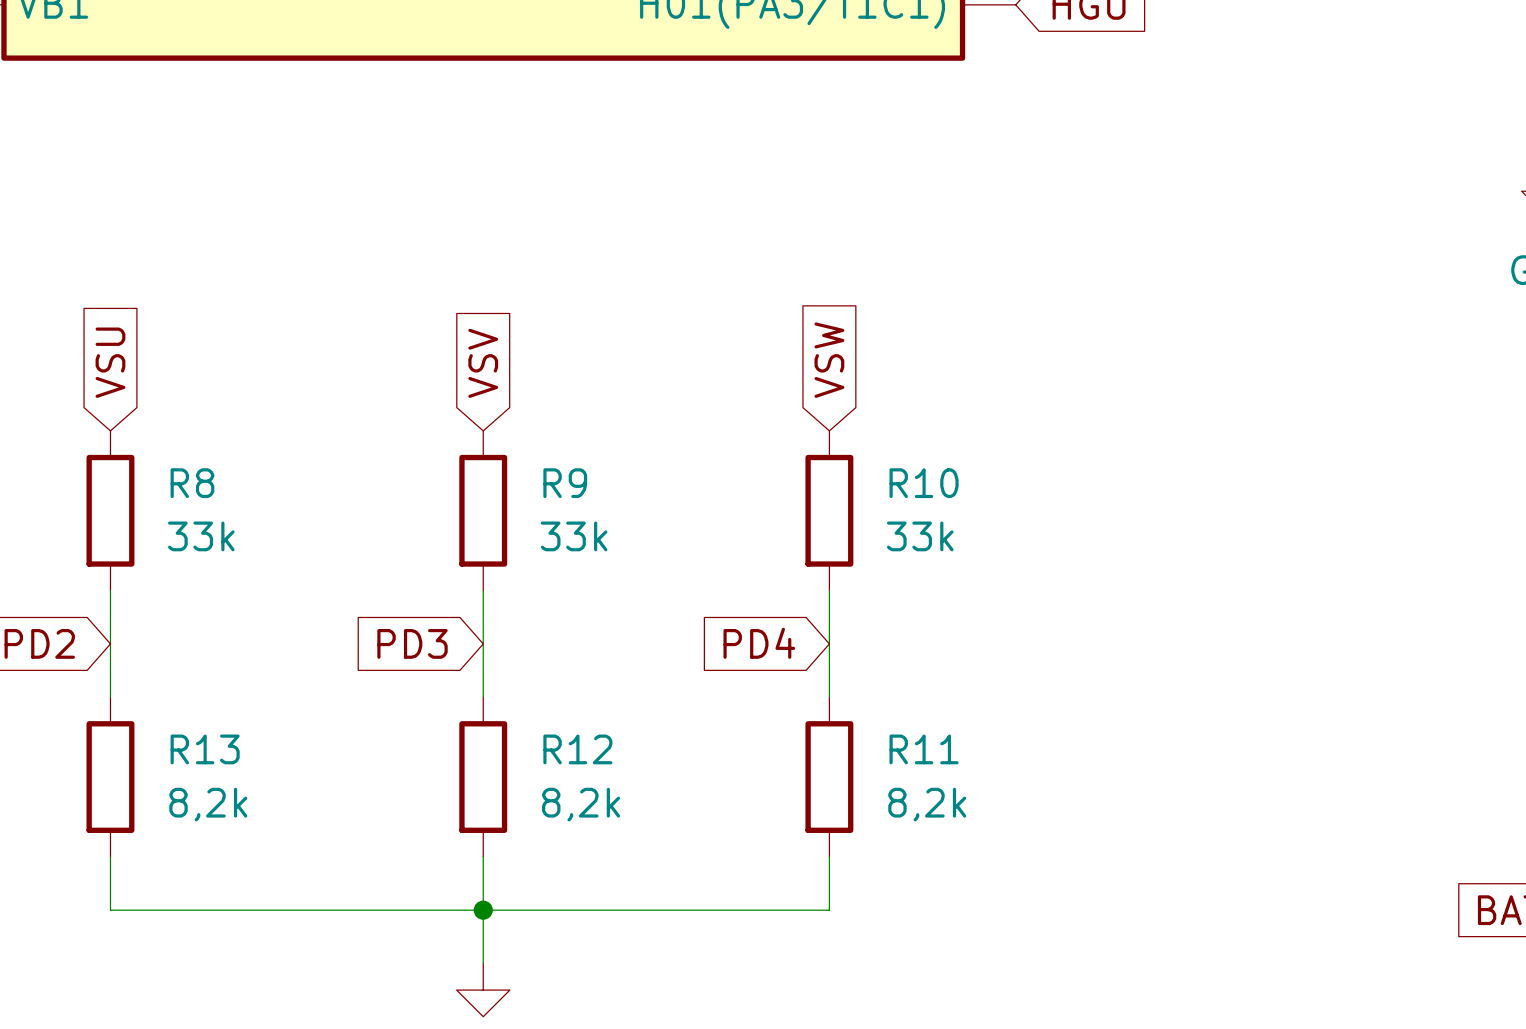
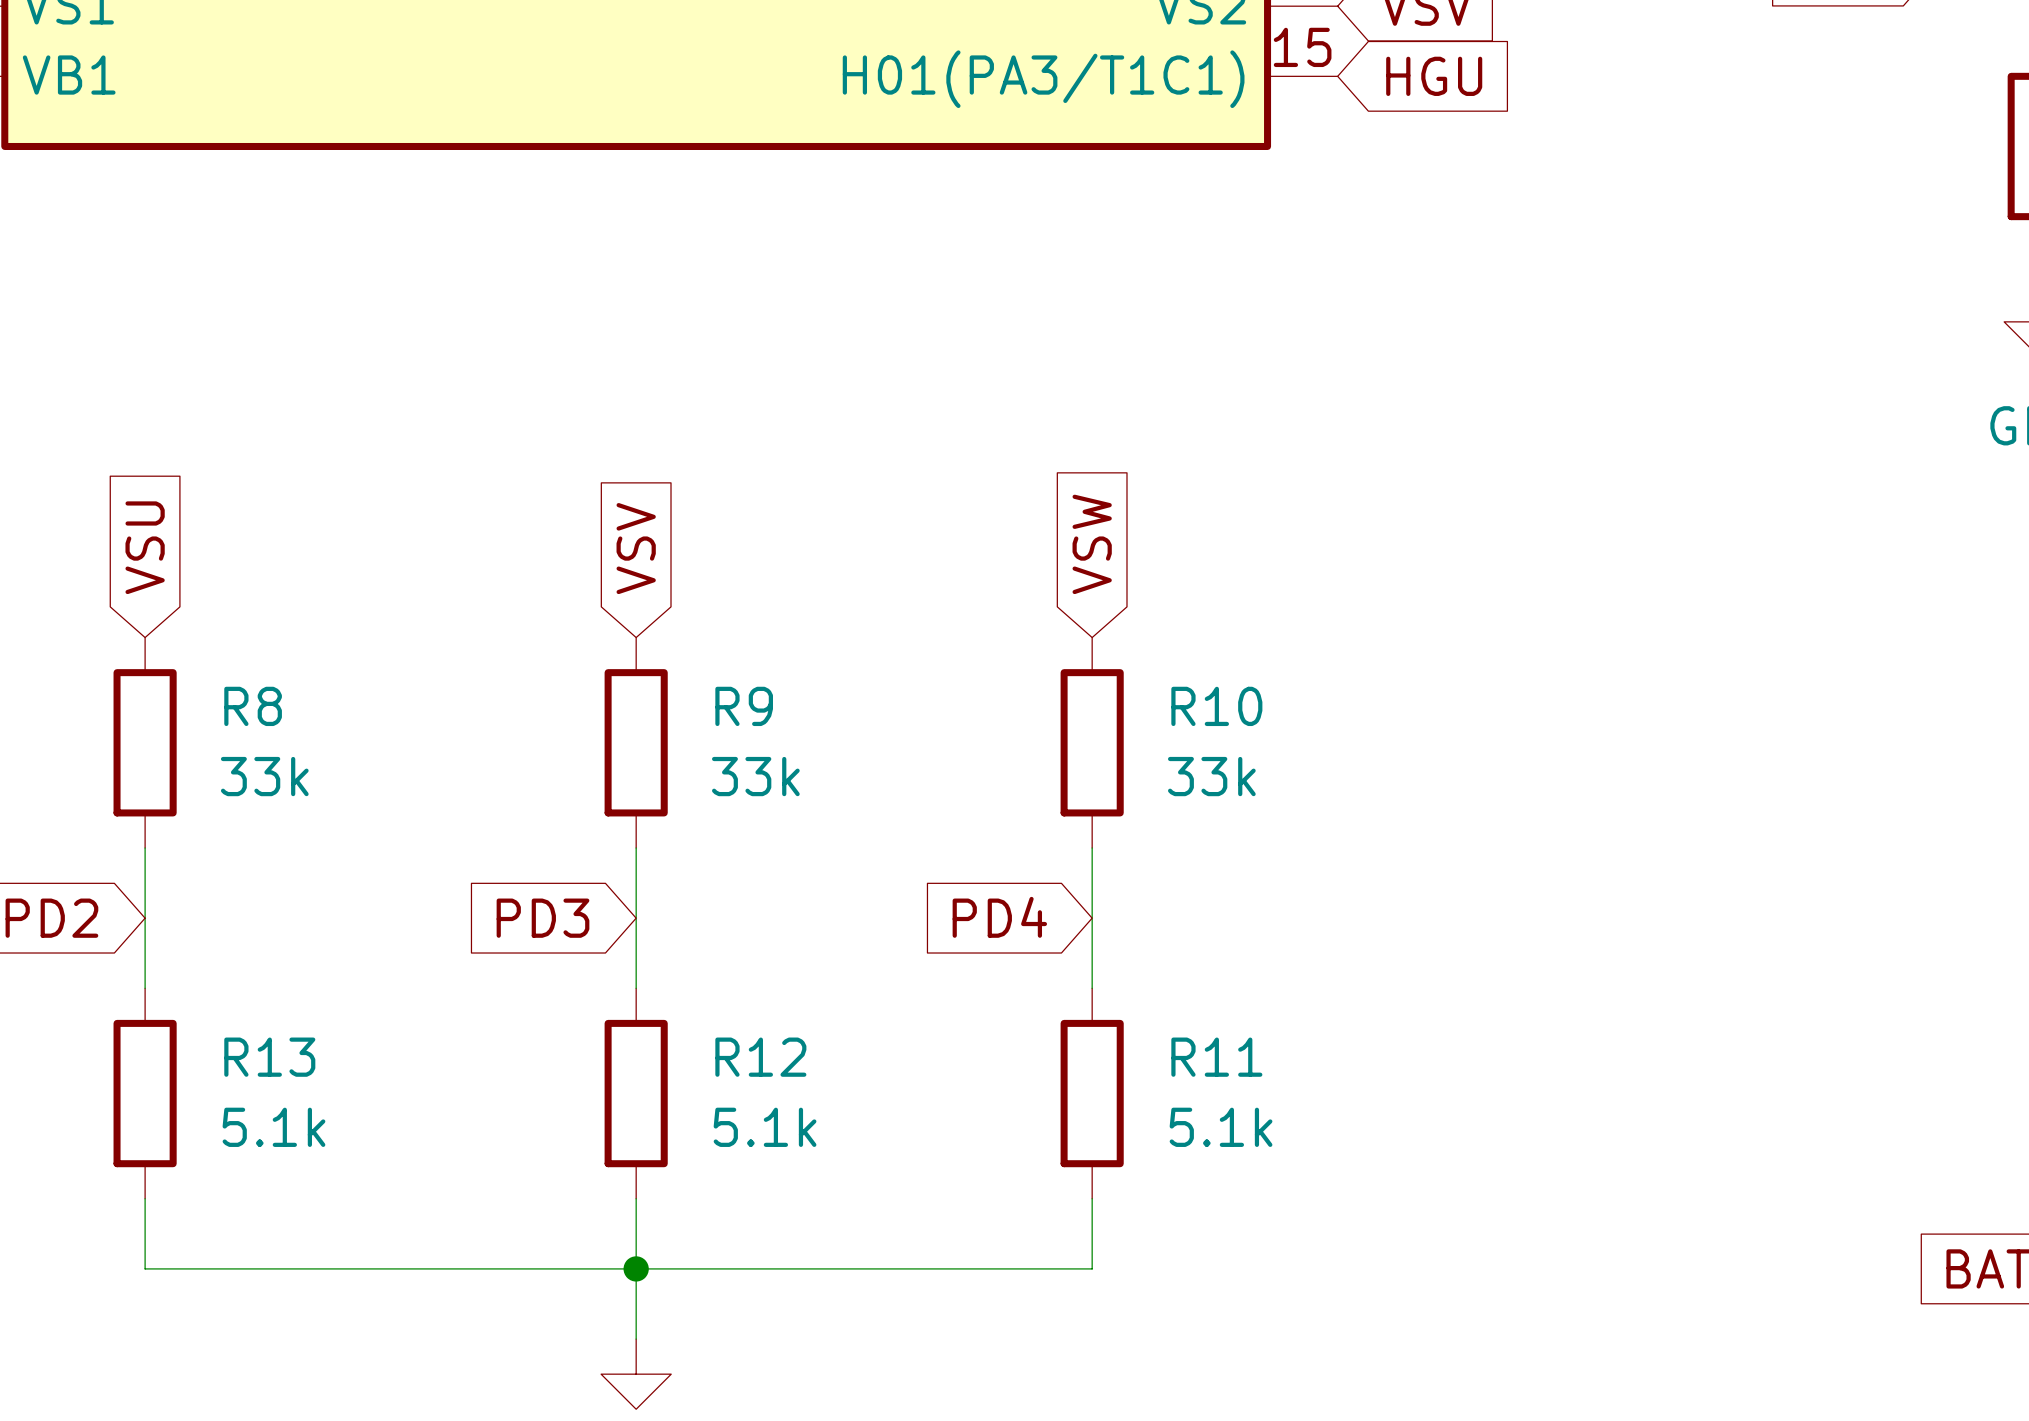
R13 value: 8,2k (208, 804) -> 5.1k (273, 1127)
R12 value: 8,2k (581, 804) -> 5.1k (765, 1127)
R11 value: 8,2k (927, 804) -> 5.1k (1221, 1127)

